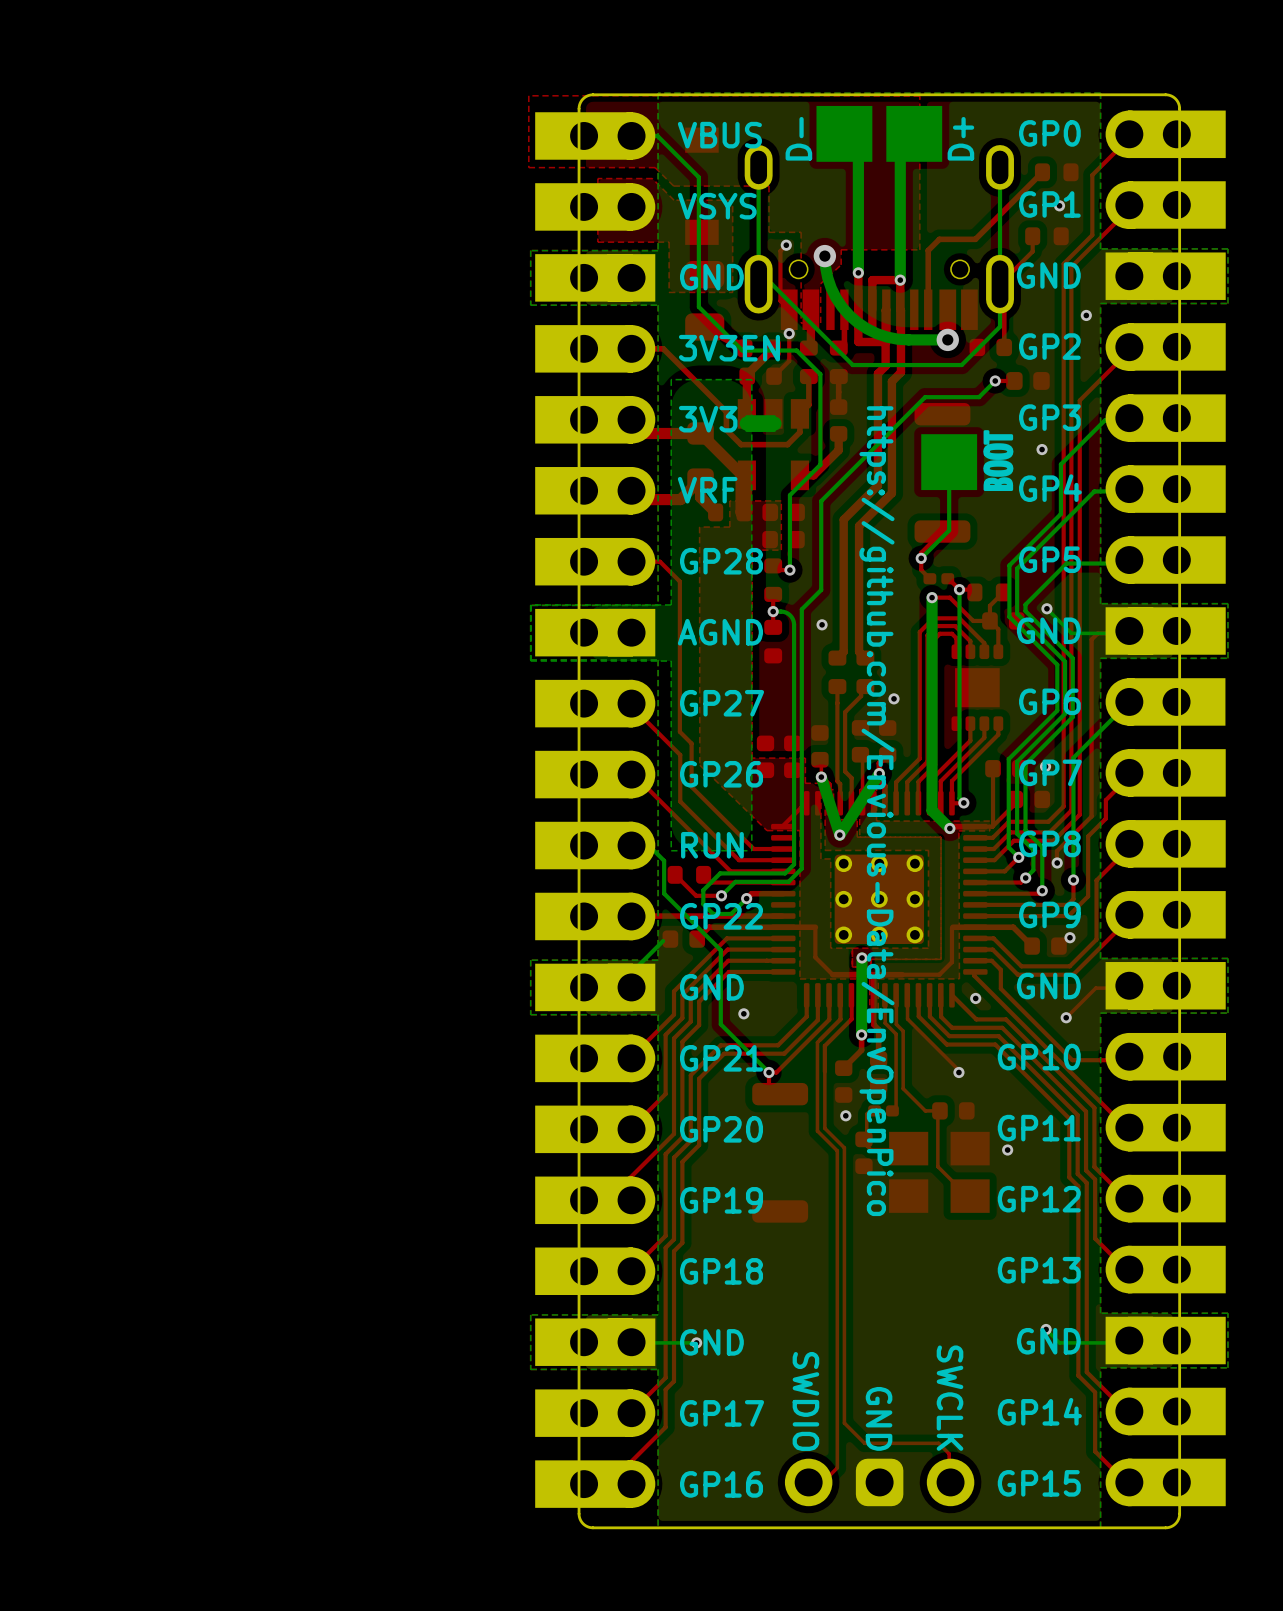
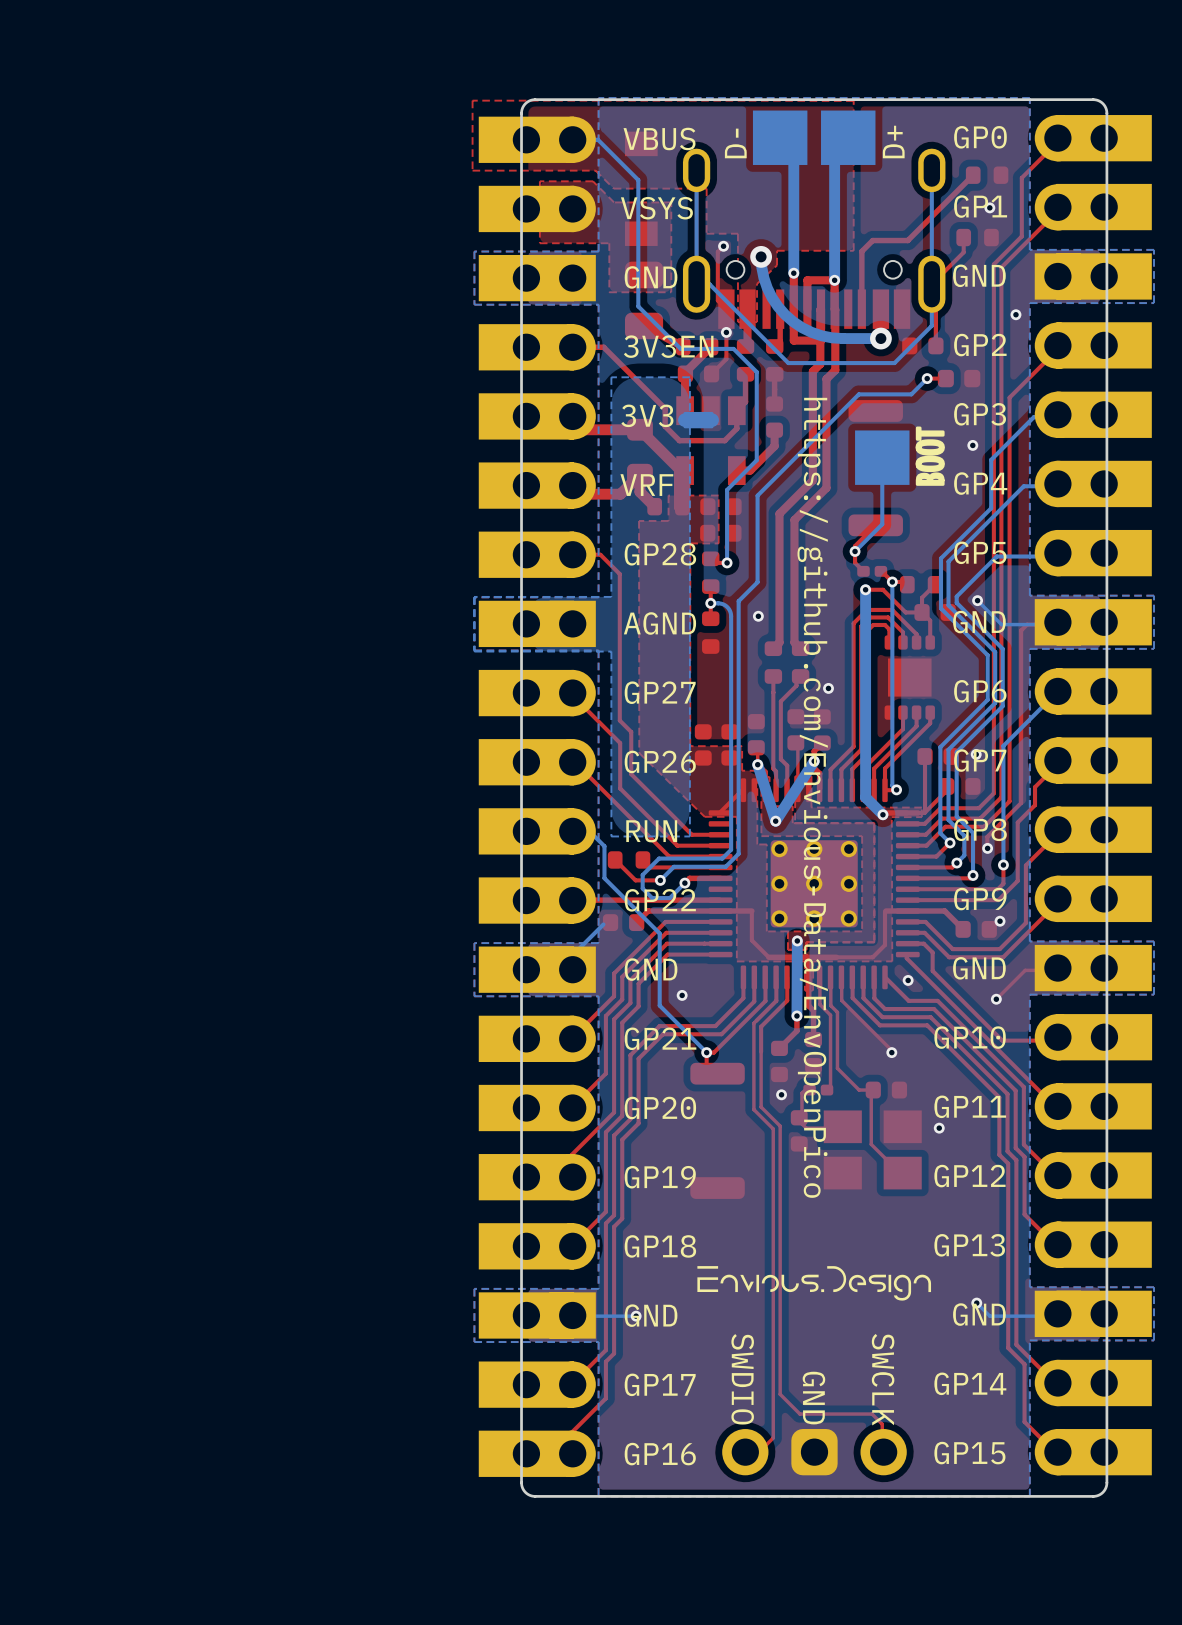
drawing: none -> [697, 1266, 932, 1301]

